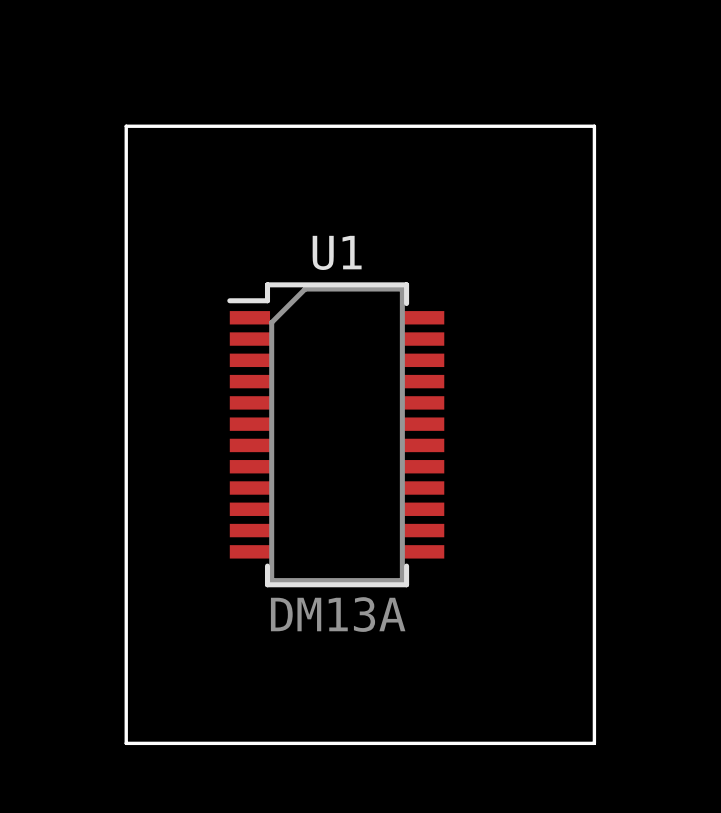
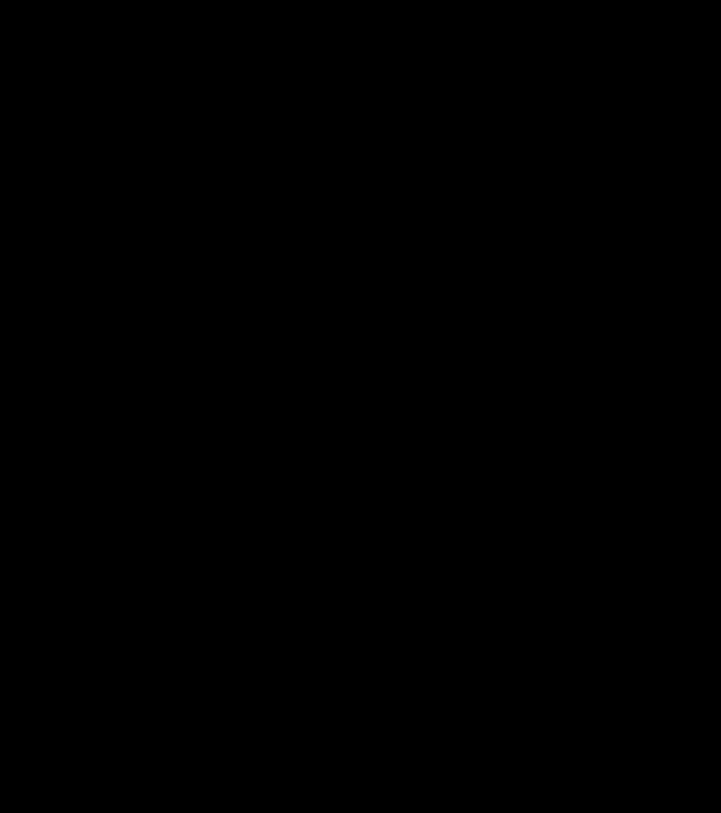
board edge: (126, 126) (594, 126) (594, 743) (126, 743) (126, 126) -> none
U1: DM13A (335, 434) -> none

